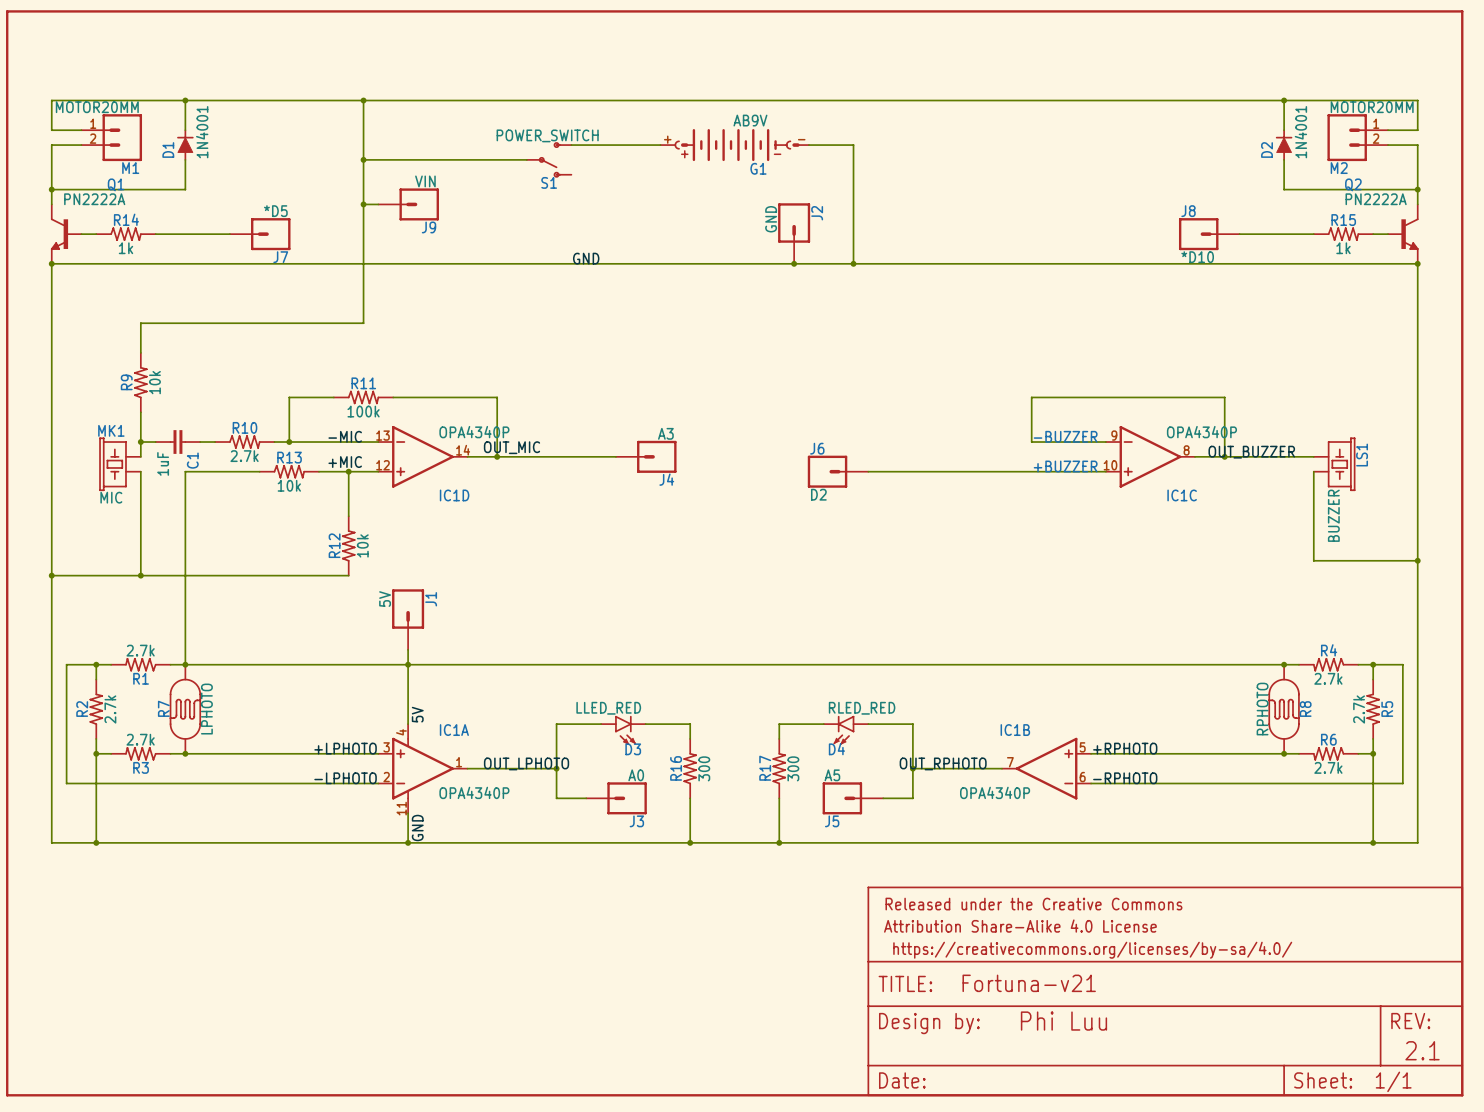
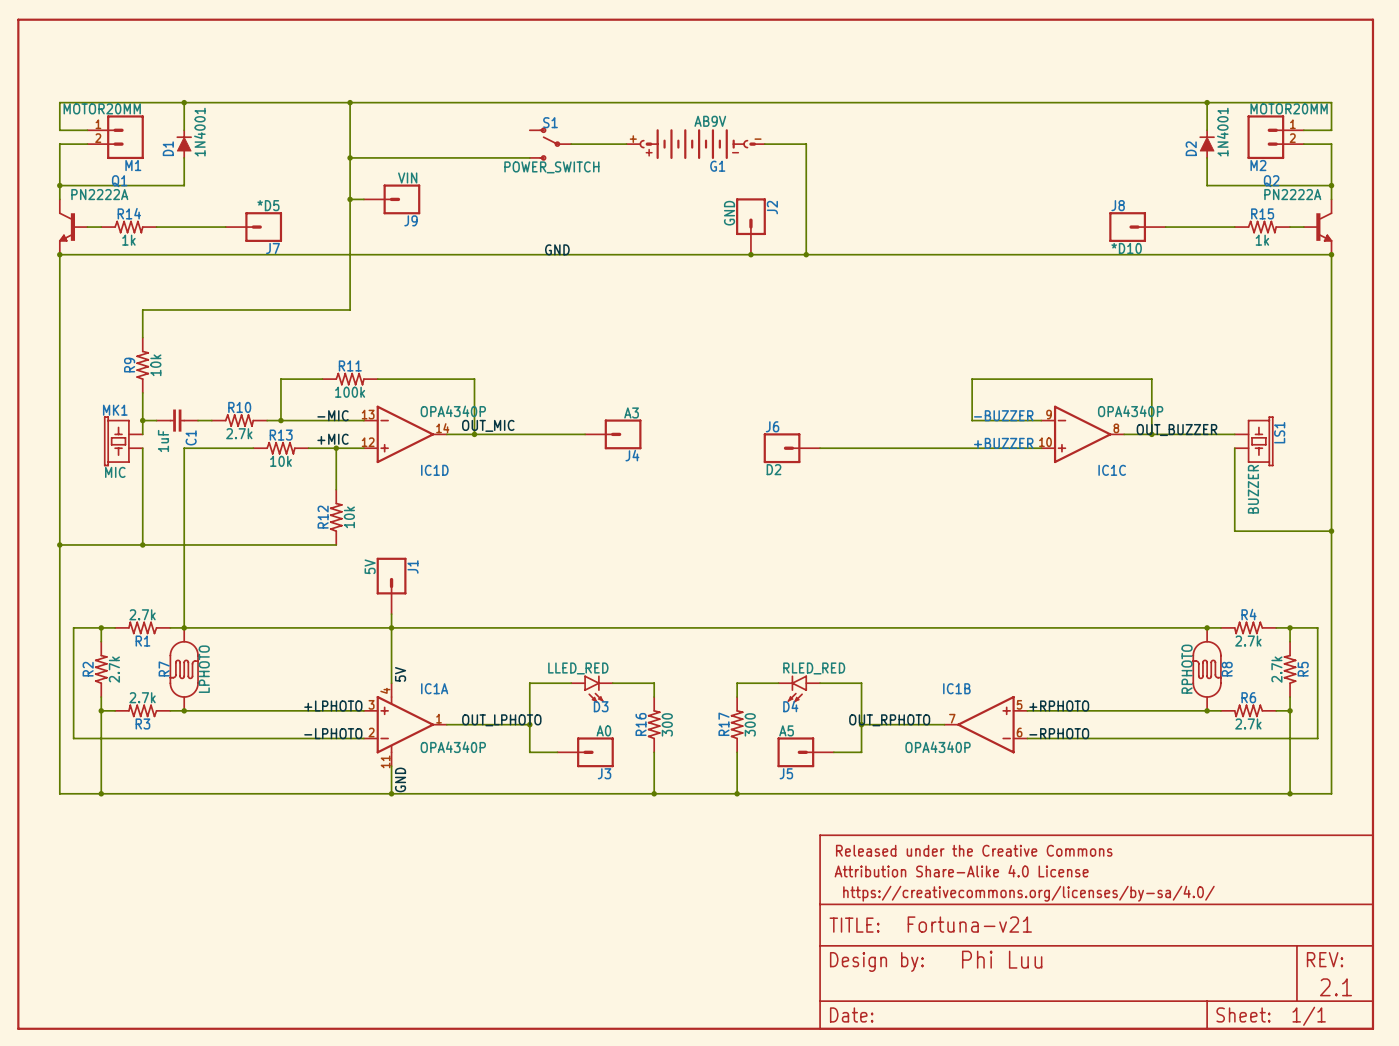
S1 rotation: 0° (549, 159) -> 180° (549, 144)
S1 position: (549, 159) -> (550, 144)

